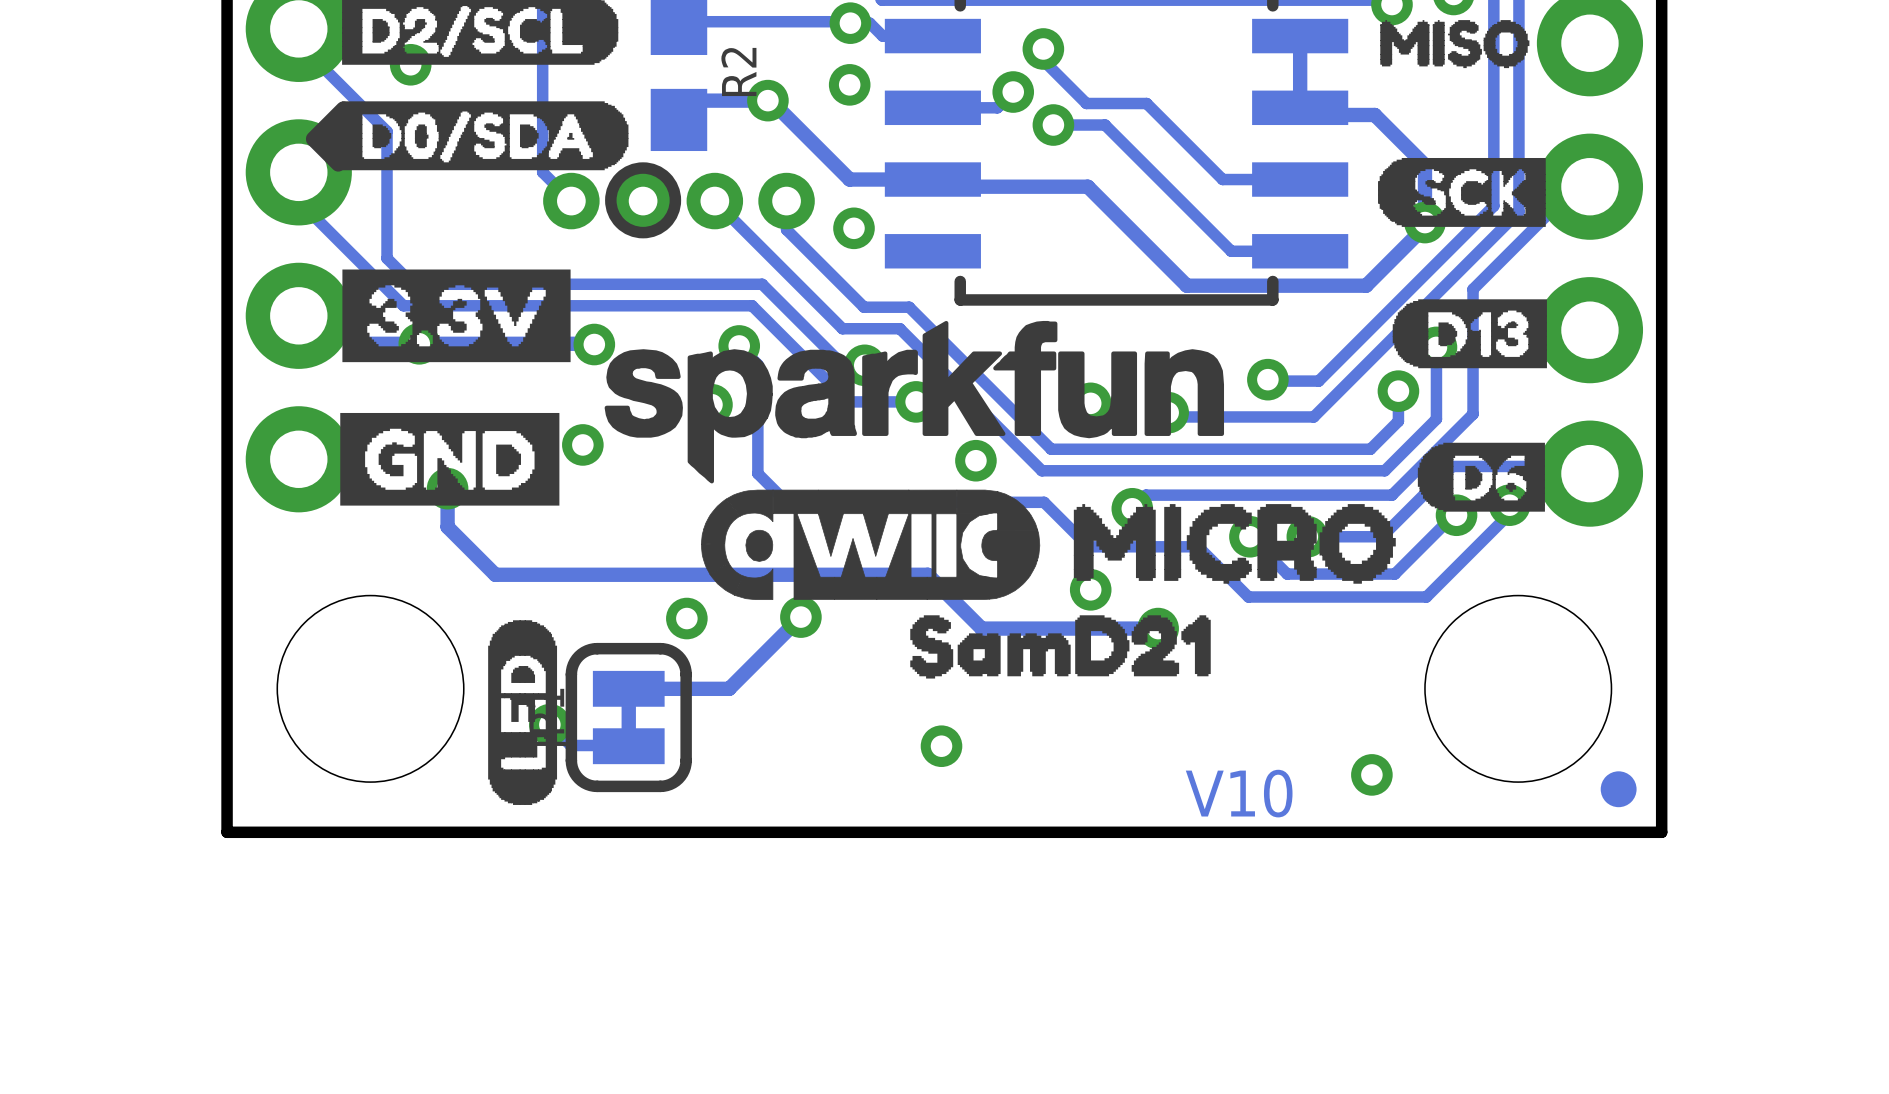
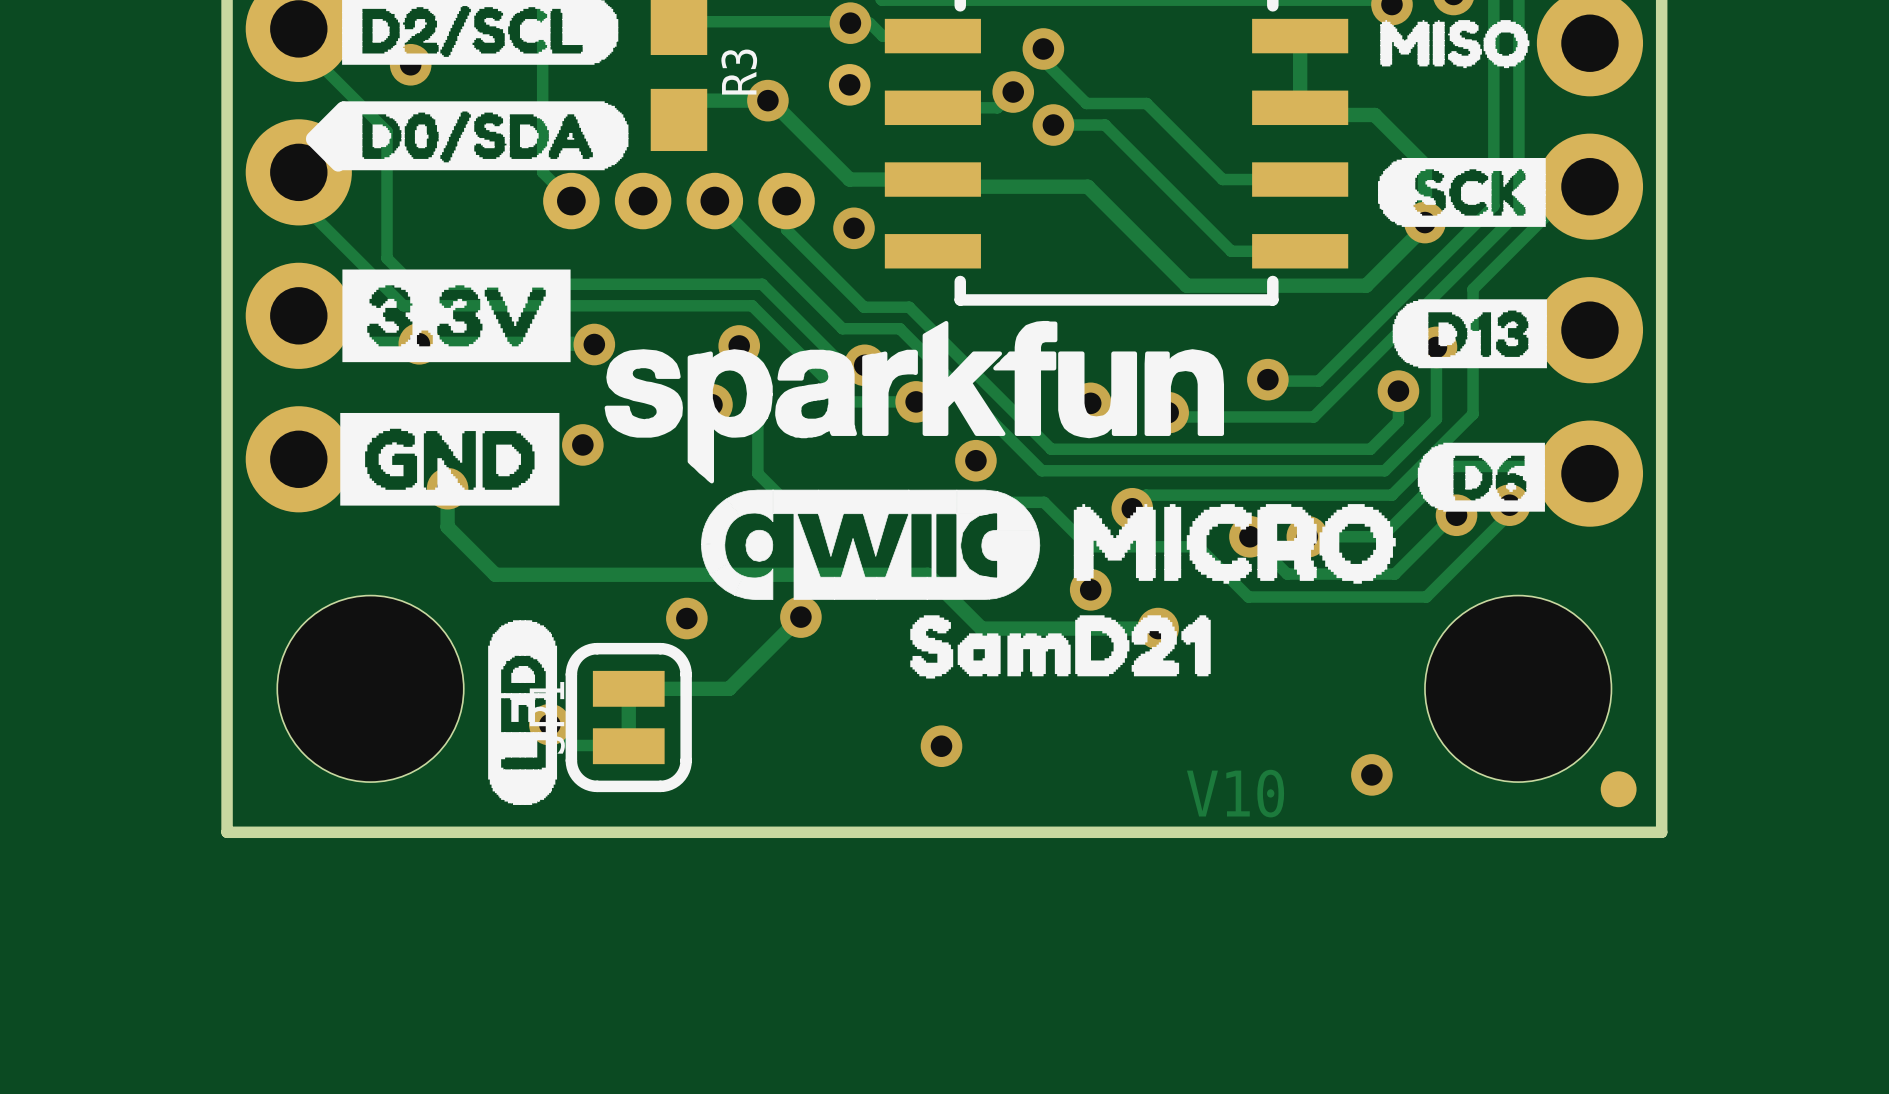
R2 name: R2 (738, 71) -> R3 (739, 72)
drawing: [605, 162, 682, 239] -> none

